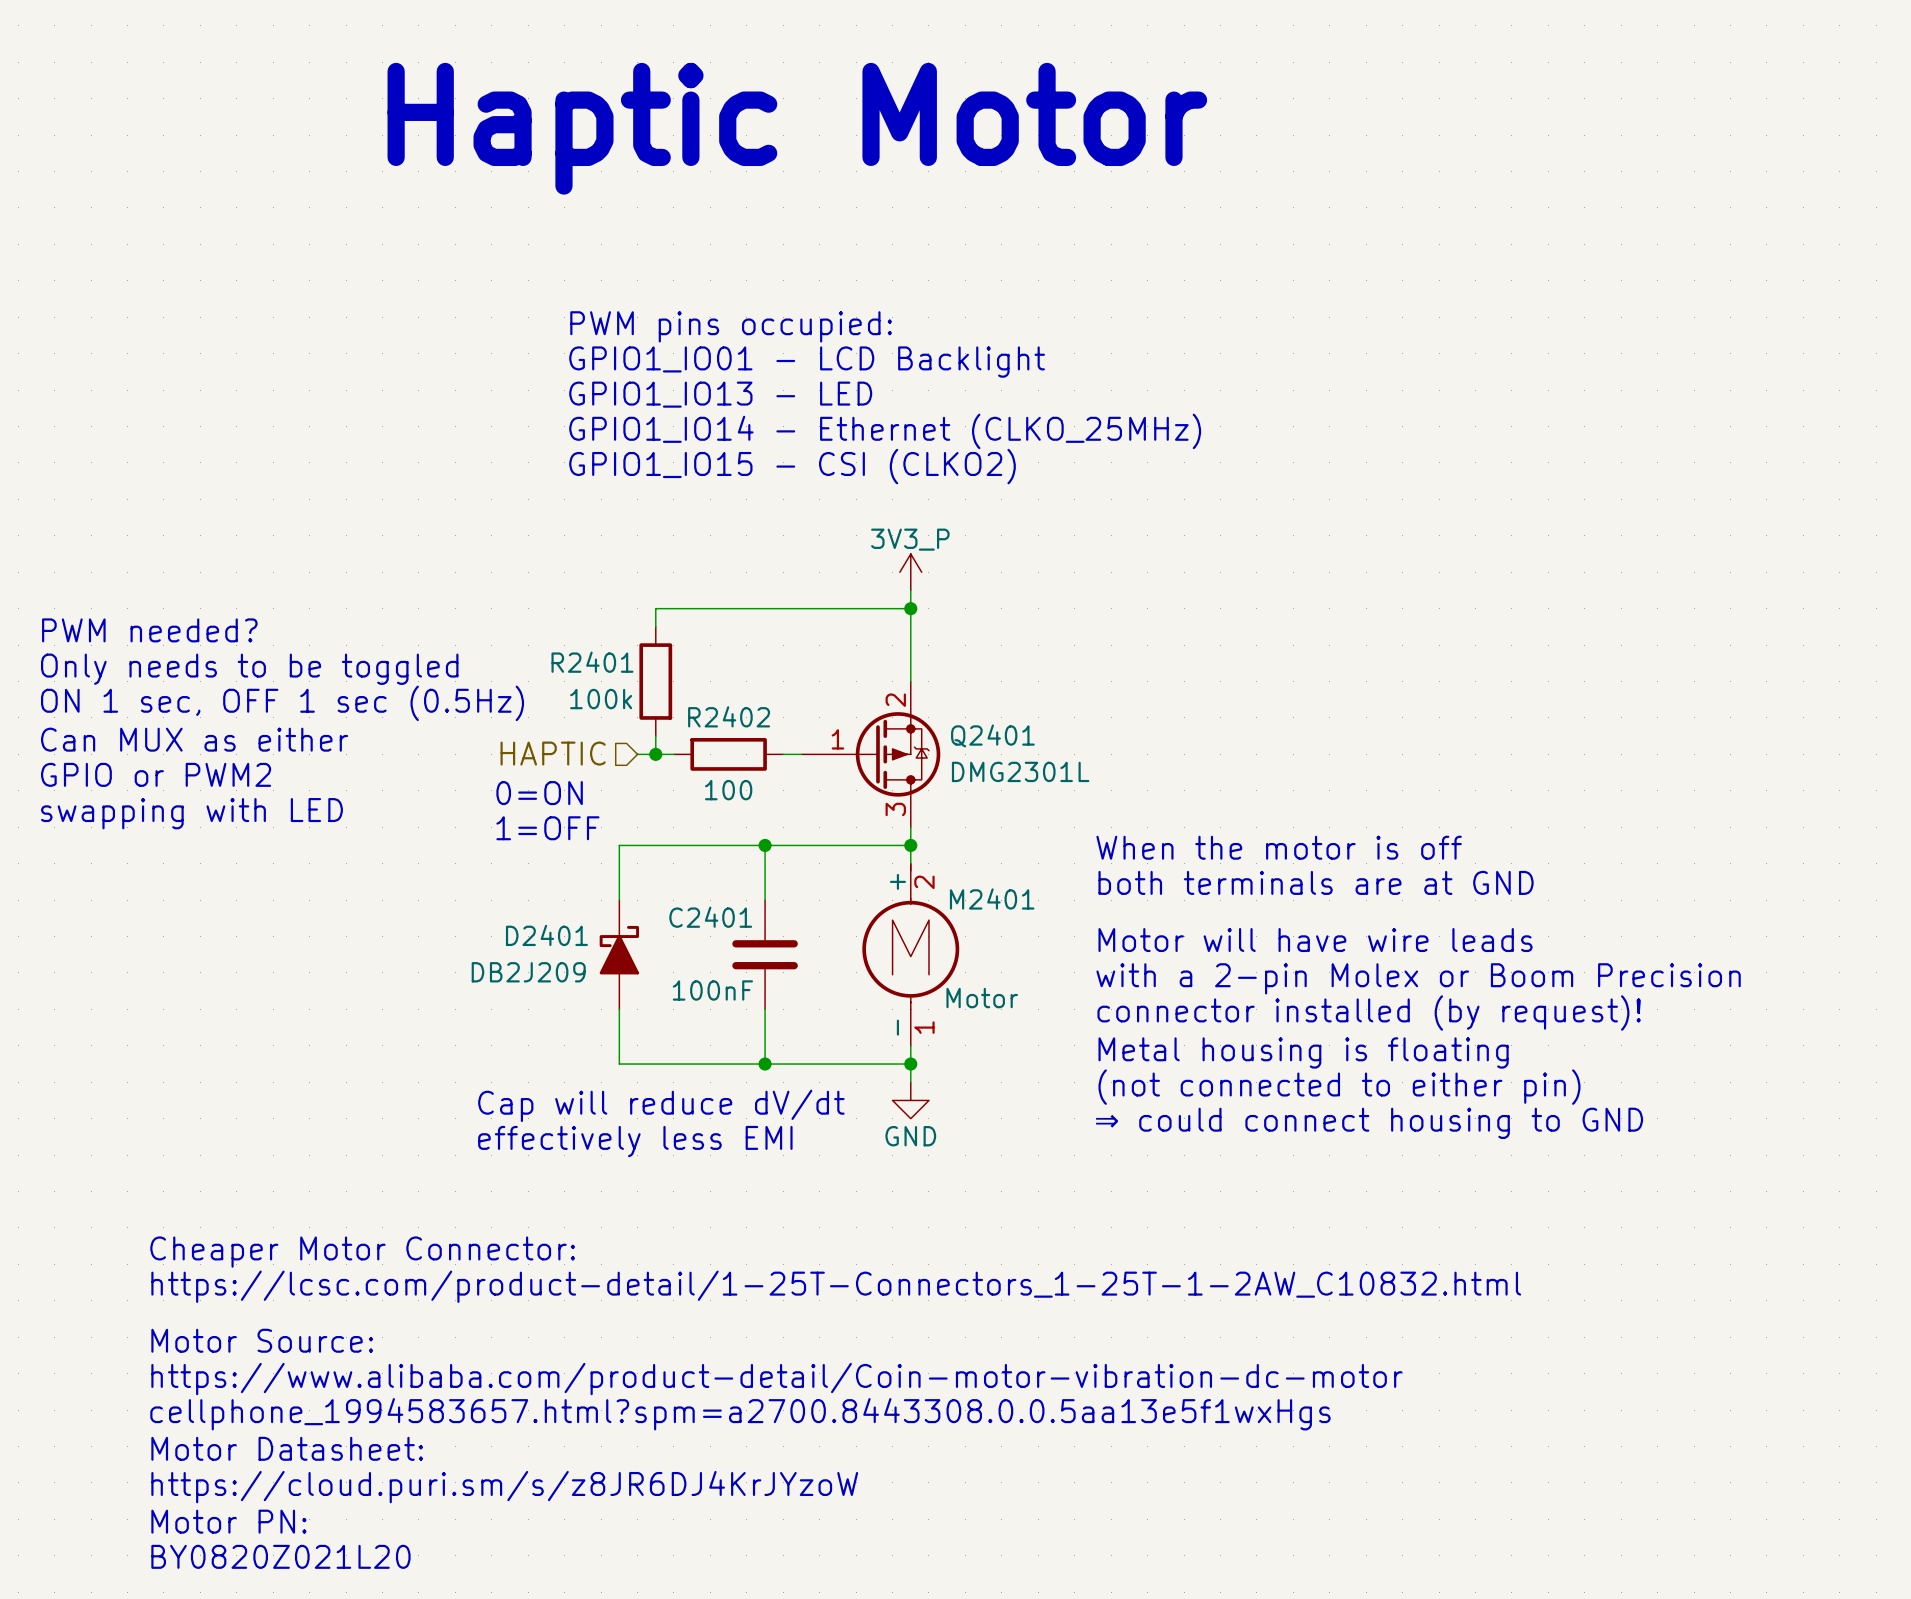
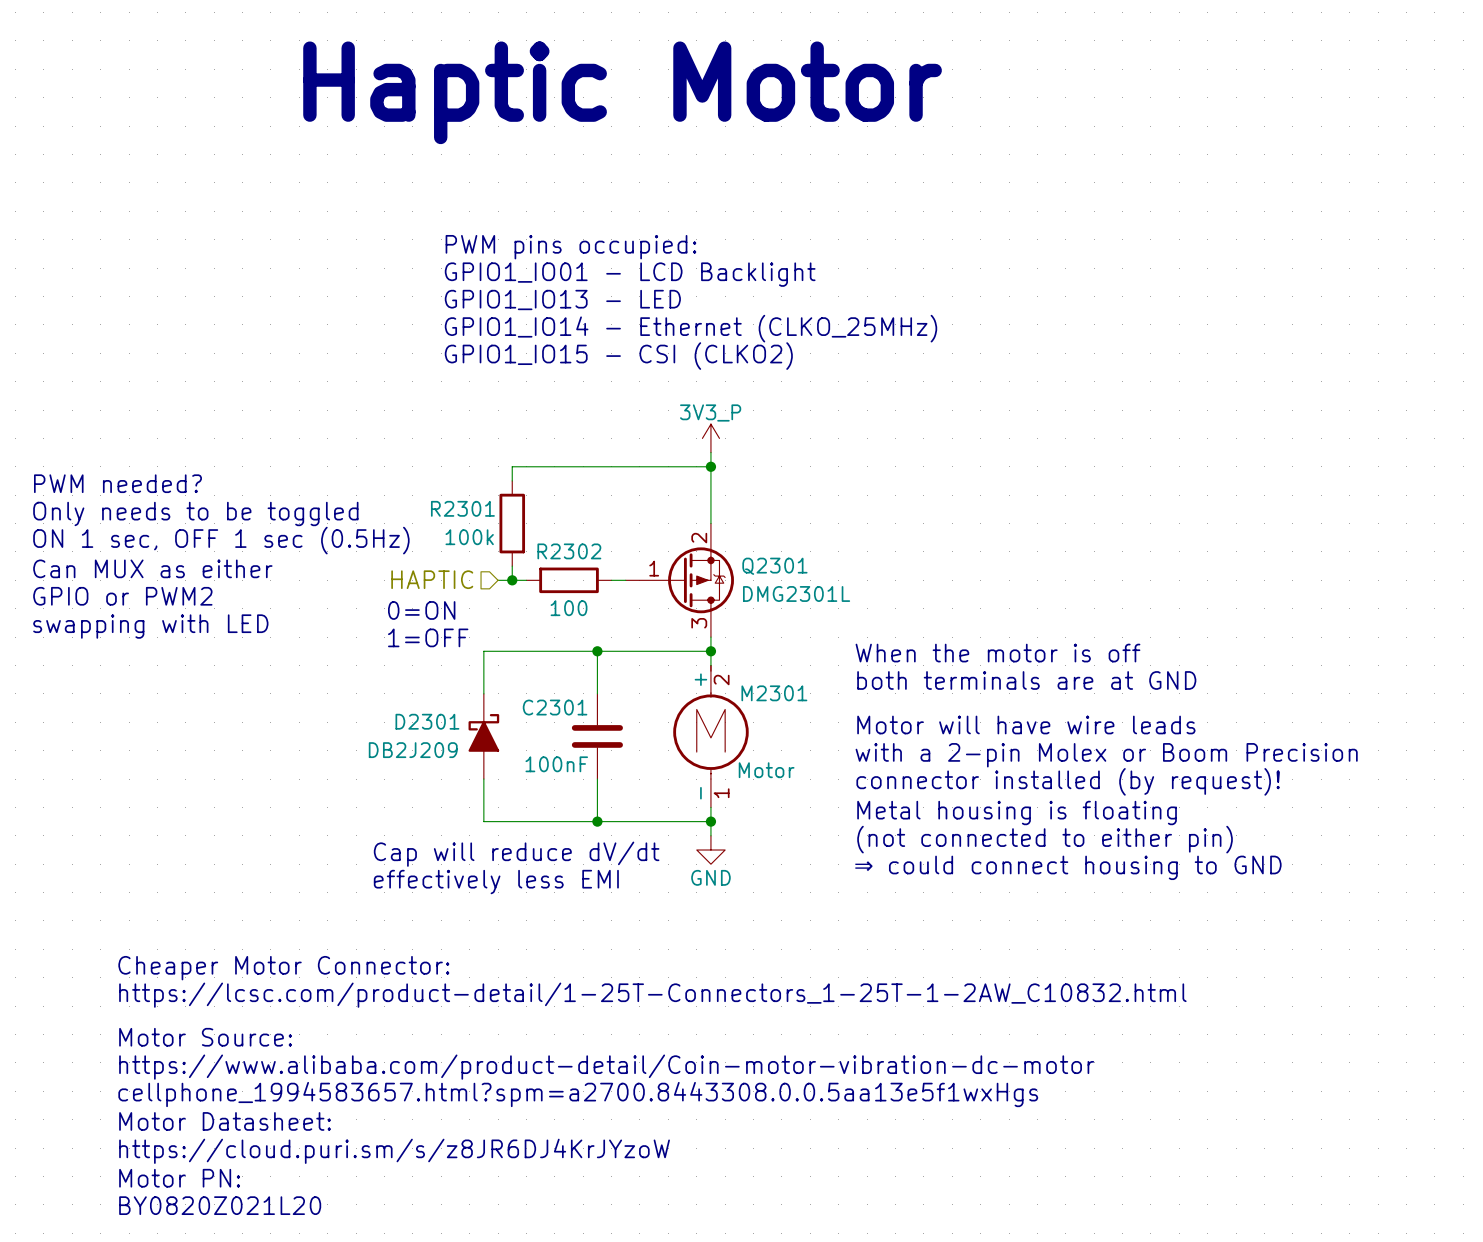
R2401 name: R2401 (592, 662) -> R2301 (462, 508)
R2402 name: R2402 (729, 716) -> R2302 (569, 551)
Q2401 name: Q2401 (992, 735) -> Q2301 (774, 566)
M2401 name: M2401 (992, 898) -> M2301 (774, 693)
C2401 name: C2401 (710, 917) -> C2301 (555, 707)
D2401 name: D2401 (546, 935) -> D2301 (427, 721)

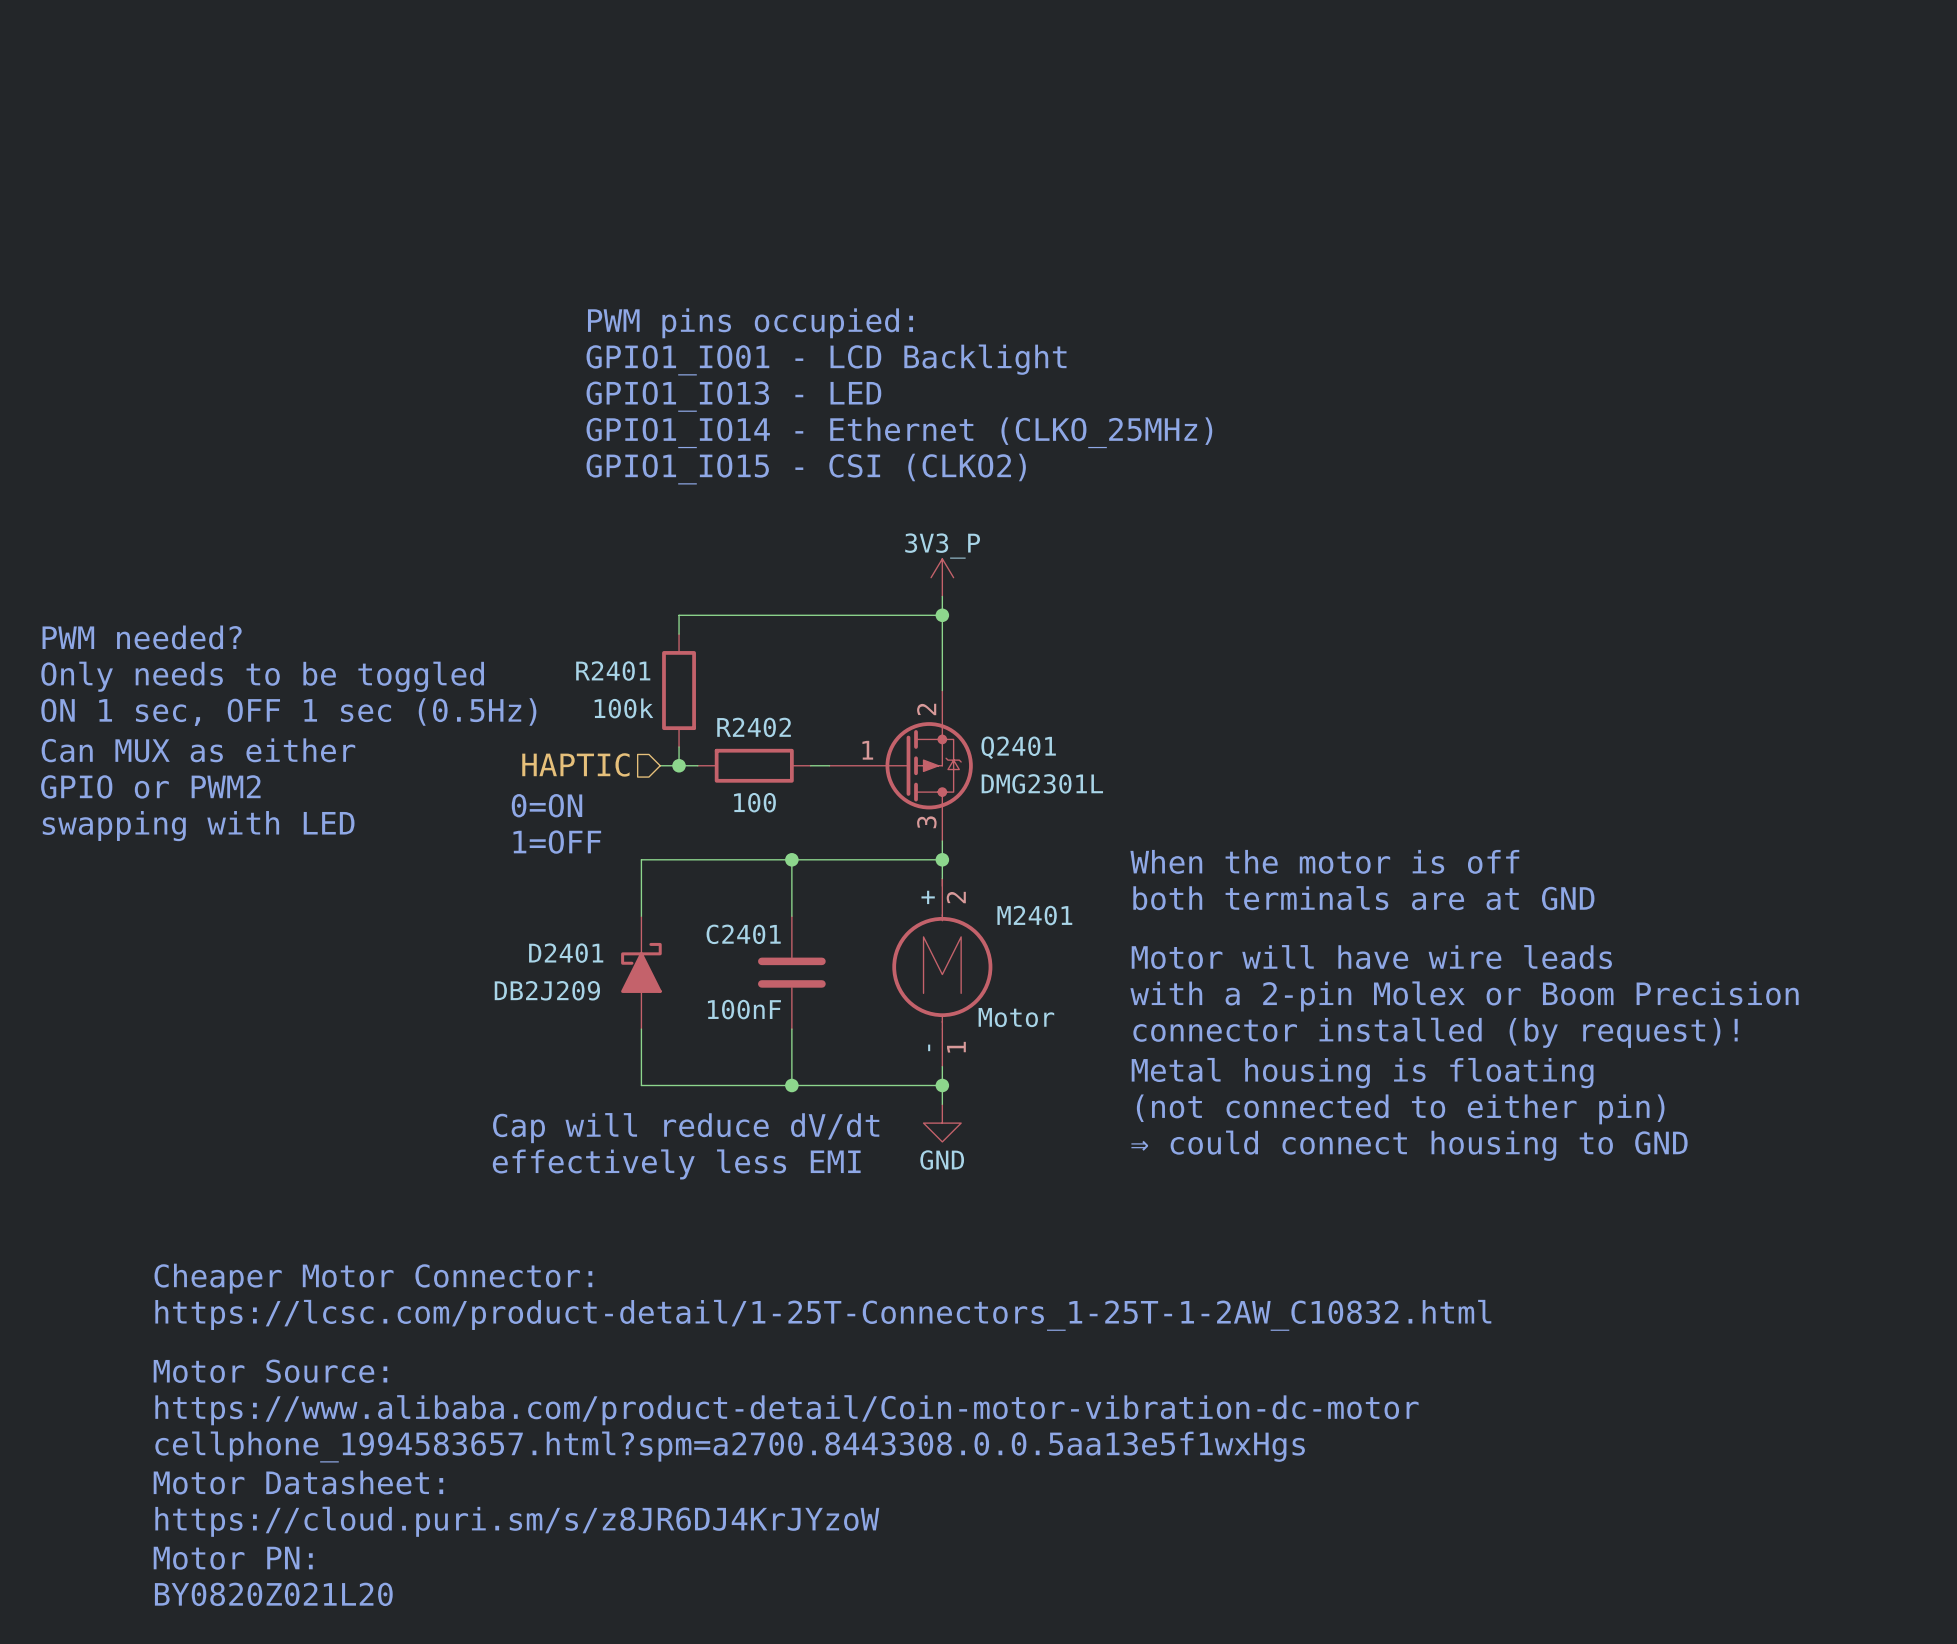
text: Haptic Motor (622, 92) -> none
R2301 name: R2301 (462, 508) -> R2401 (613, 671)
R2302 name: R2302 (569, 551) -> R2402 (754, 727)
Q2301 name: Q2301 (774, 566) -> Q2401 (1018, 747)
M2301 name: M2301 (774, 693) -> M2401 (1034, 915)
C2301 name: C2301 (555, 707) -> C2401 (743, 934)
D2301 name: D2301 (427, 721) -> D2401 (566, 953)

